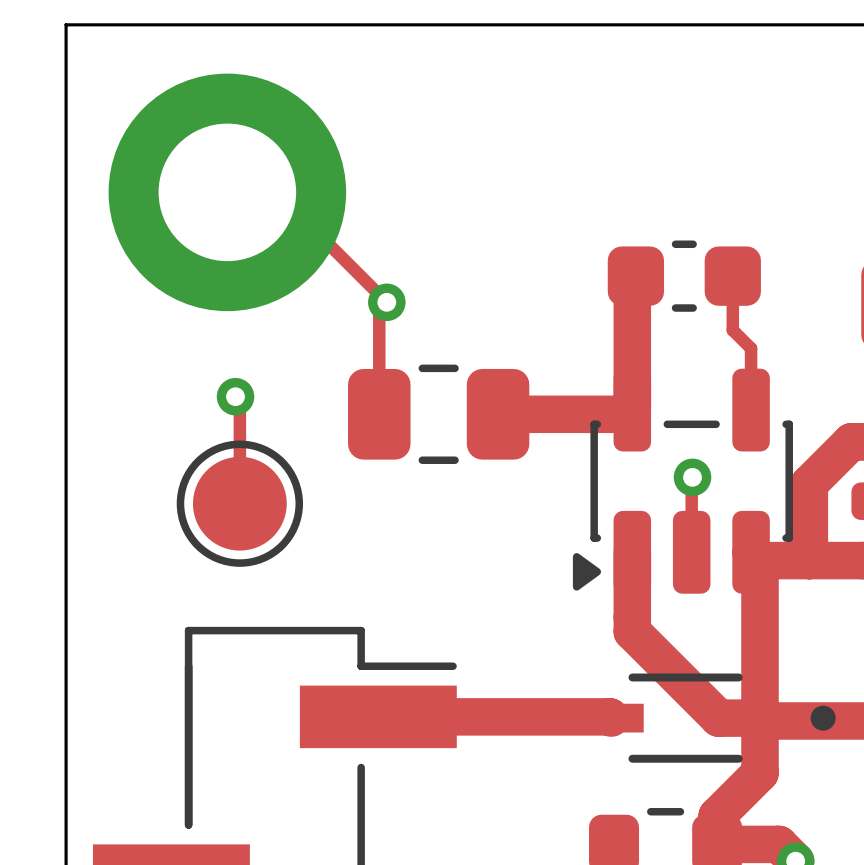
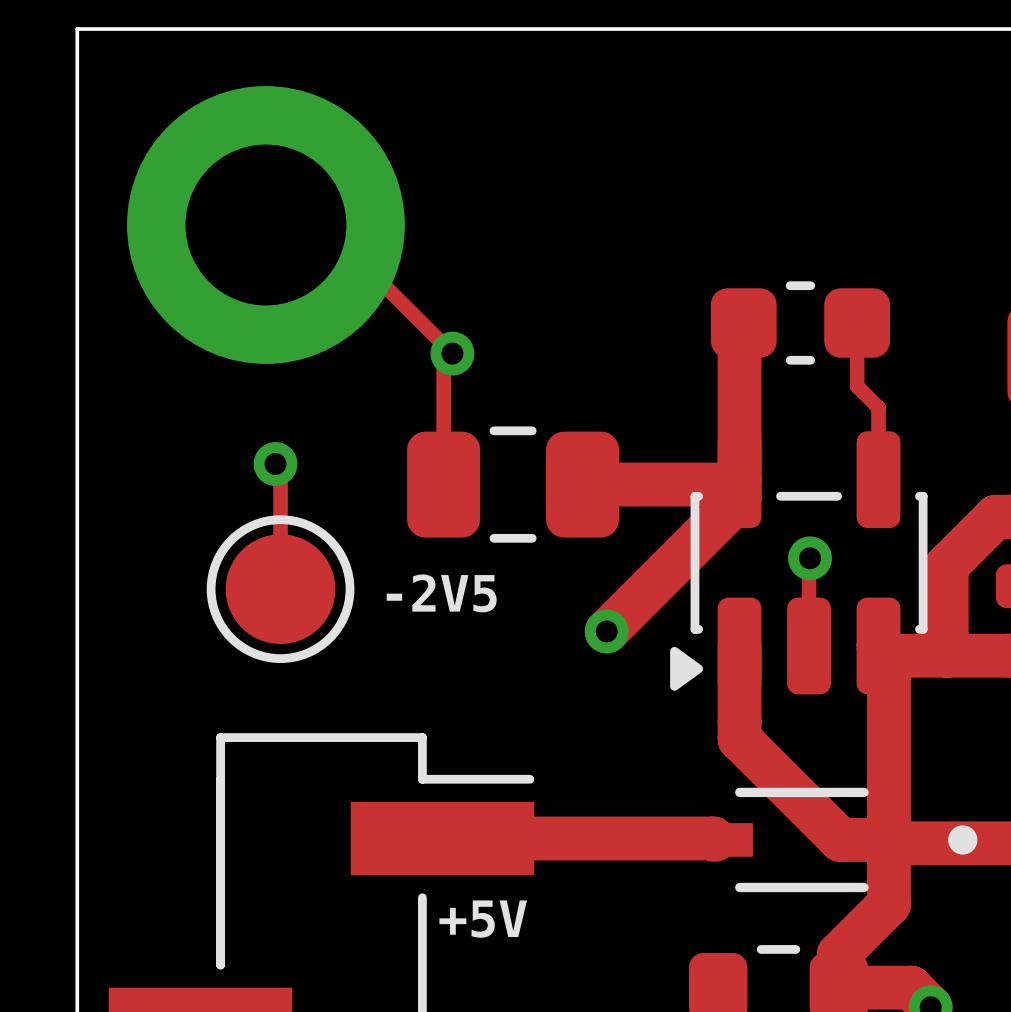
track: none -> (739, 479) (739, 498) (606, 631)
text: none -> -2V5 (441, 593)
via: none -> (606, 631)
text: none -> +5V (483, 919)

